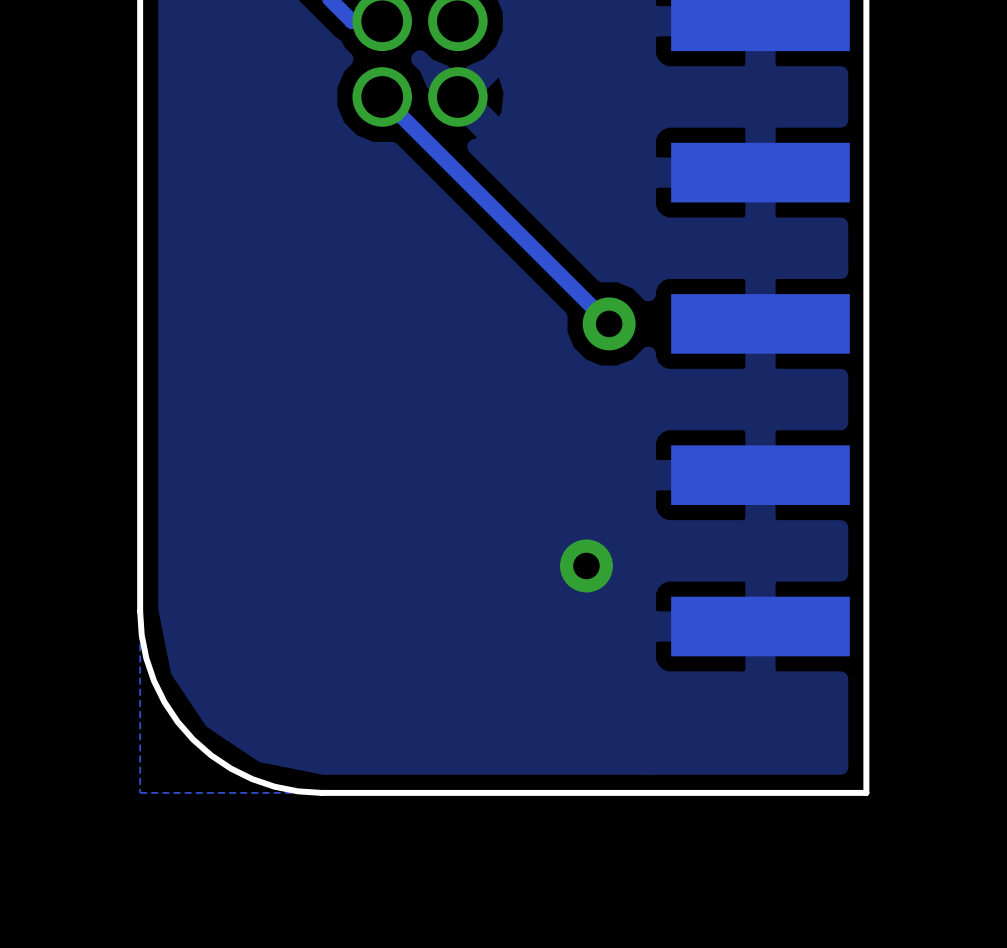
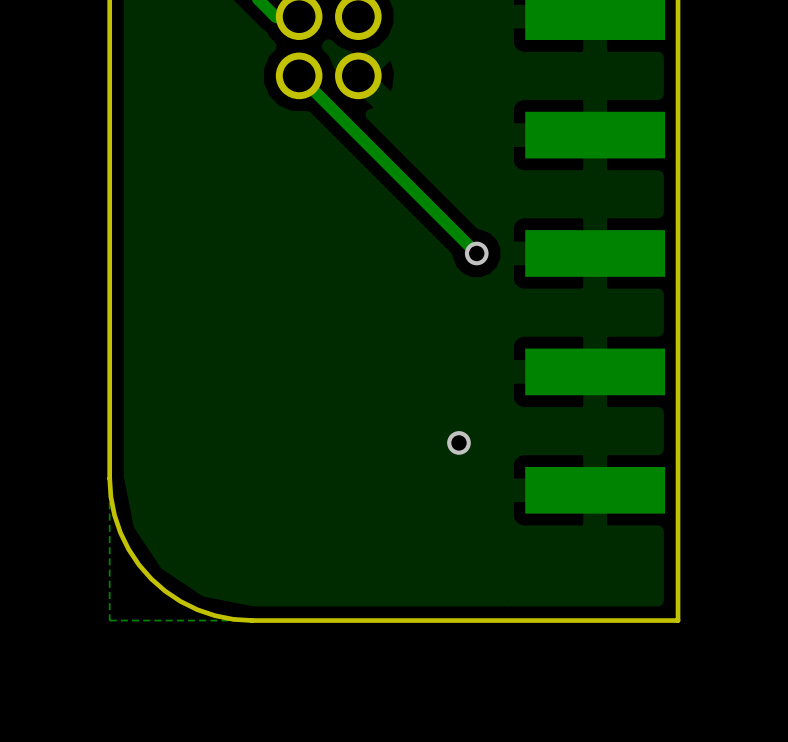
via size: [582, 297, 636, 351] -> [464, 241, 489, 266]
via size: [559, 539, 613, 593] -> [447, 431, 471, 455]

